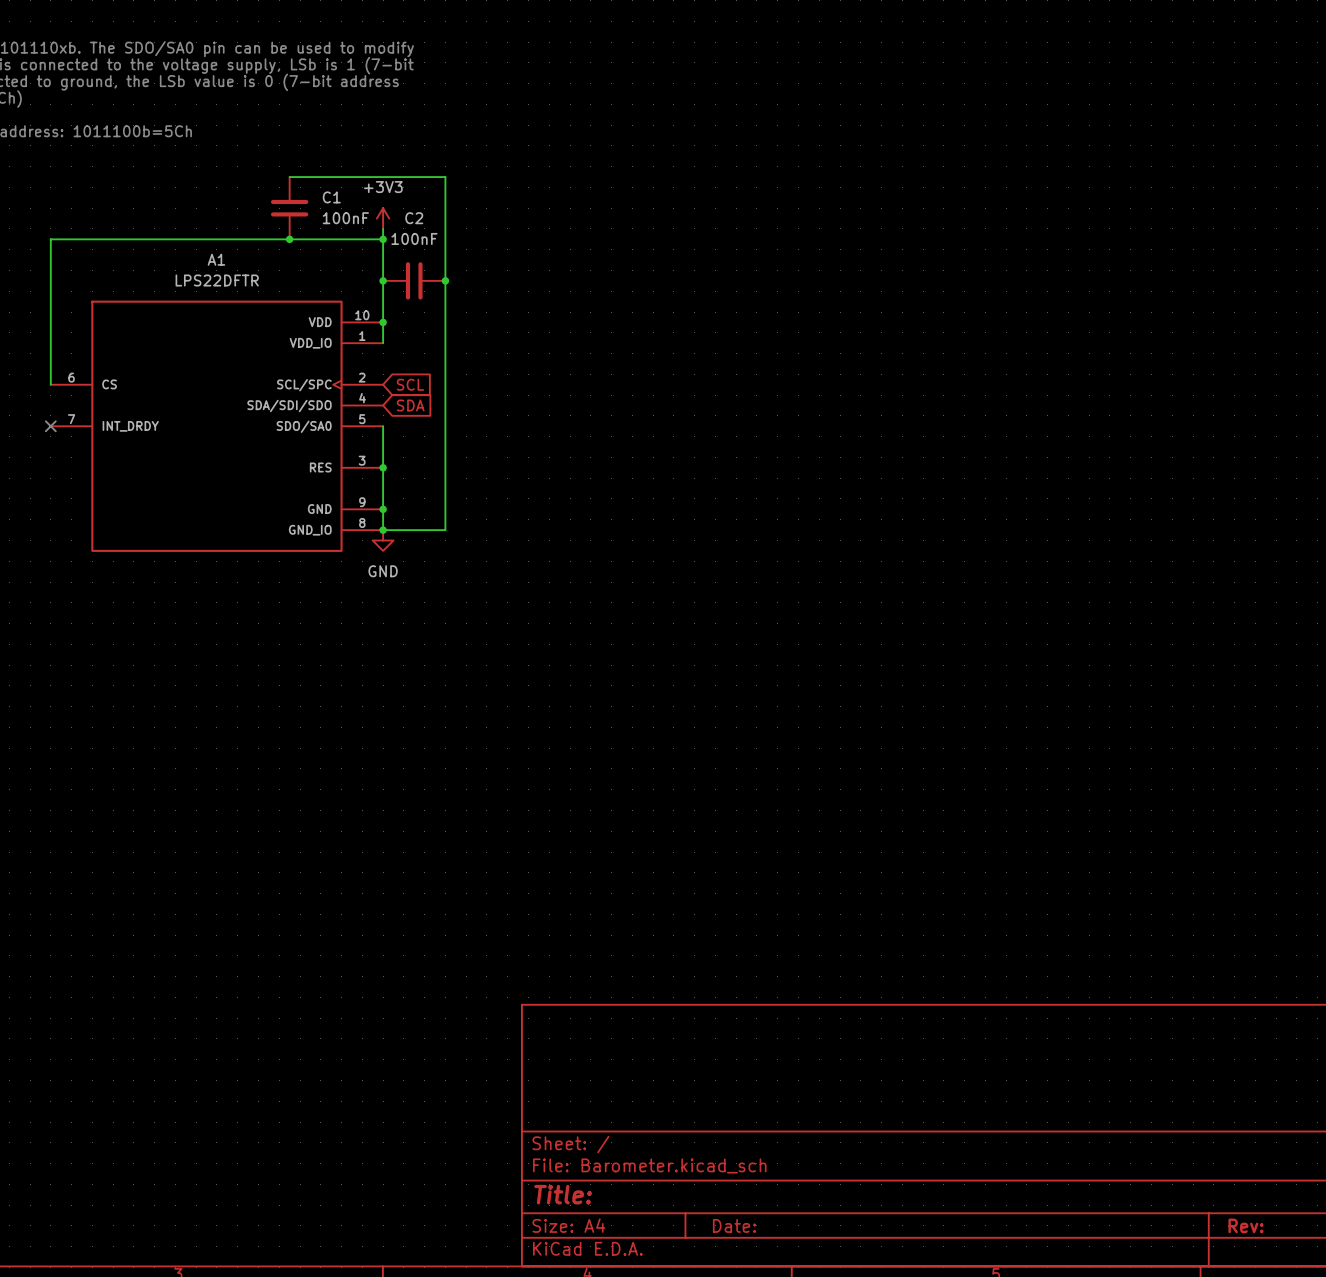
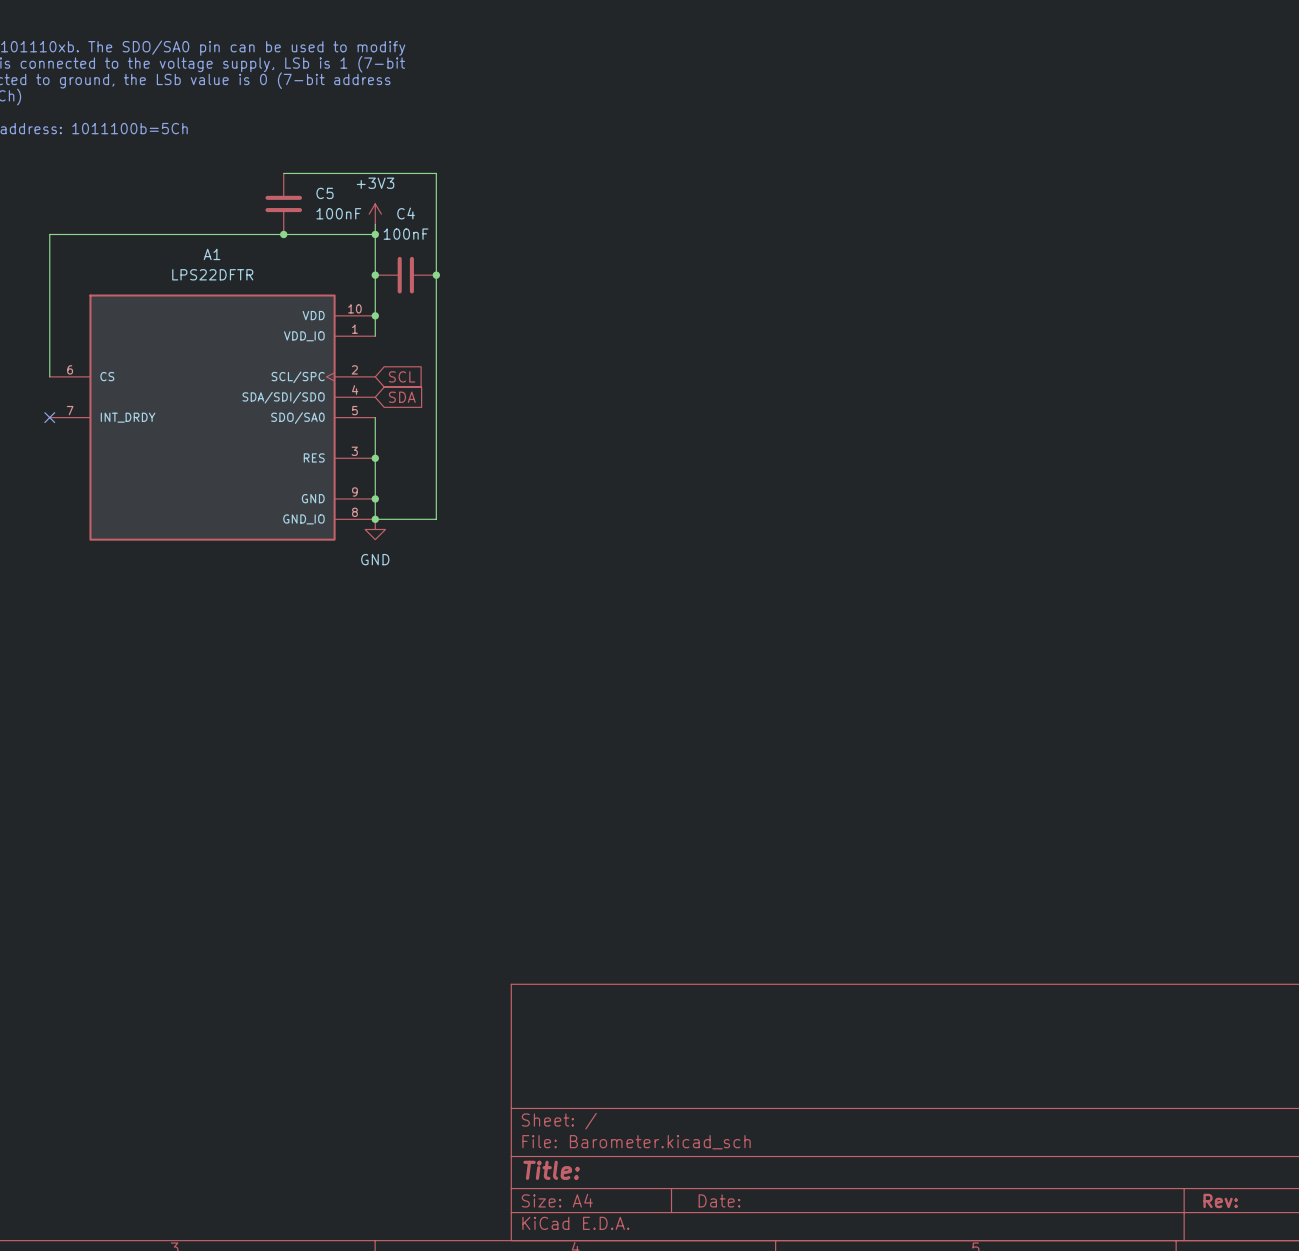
C1 name: C1 (331, 197) -> C5 (324, 193)
C2 name: C2 (414, 218) -> C4 (406, 213)

